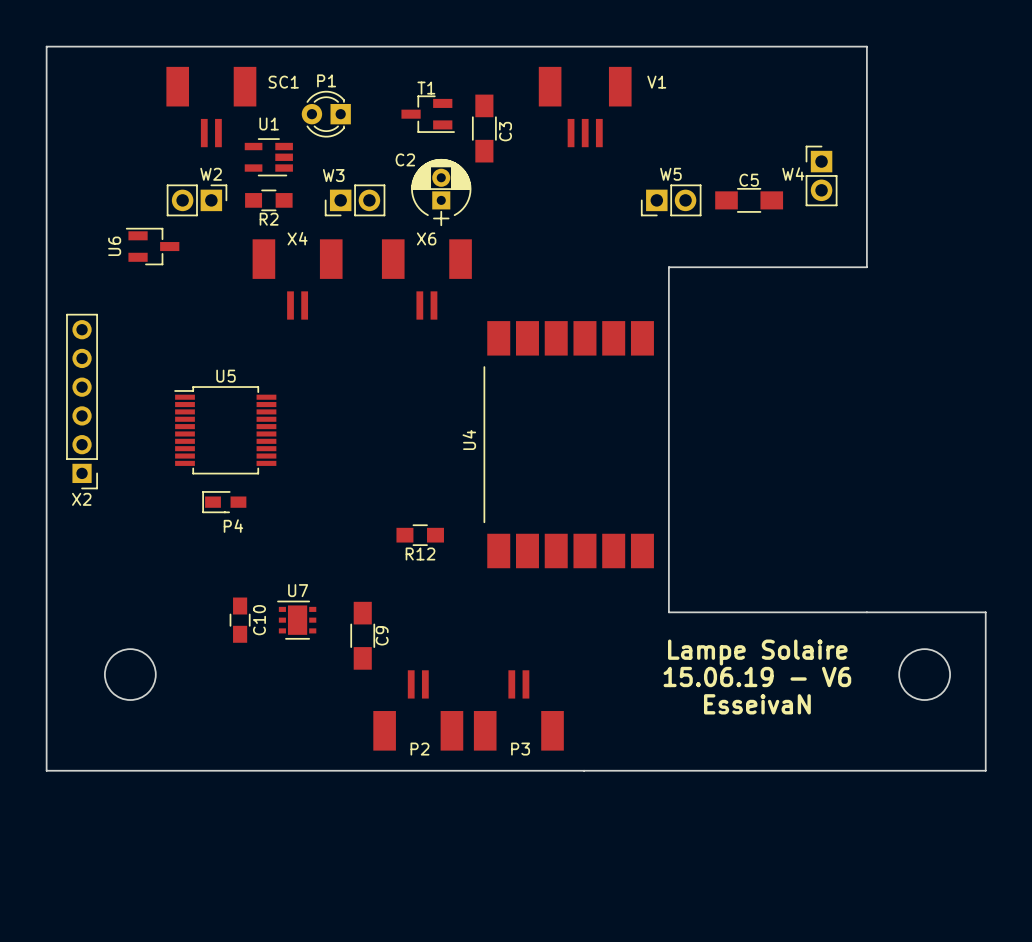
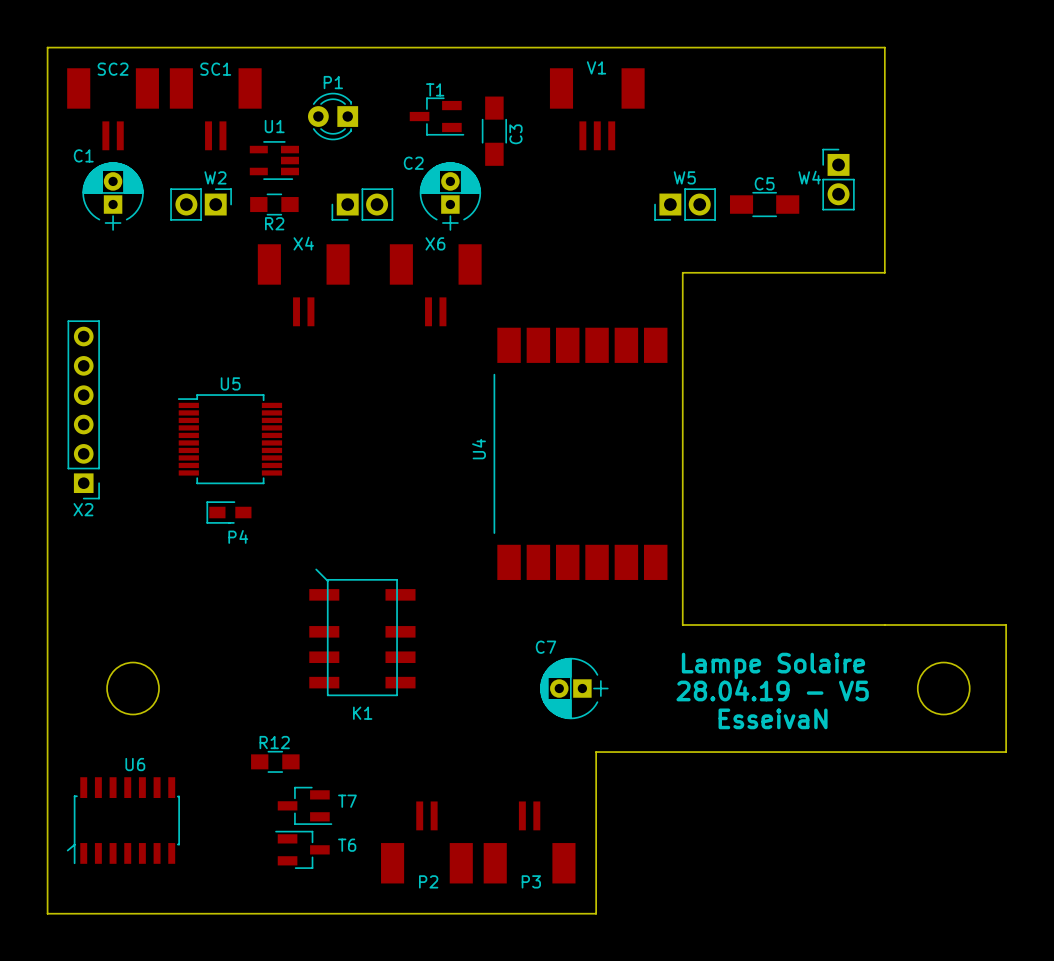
SC1 name position: SC1 (283, 82) -> SC1 (215, 69)
V1 name position: V1 (656, 82) -> V1 (596, 67)
SC2: none -> (113, 109)
W3 name: W3 (333, 175) -> none
C1: none -> (113, 196)
U6 footprint: [126, 227, 180, 266] -> [66, 777, 180, 865]
U6 name position: U6 (114, 246) -> U6 (135, 764)
R12 position: (420, 535) -> (275, 761)
R12 name position: R12 (420, 553) -> R12 (274, 742)
K1: none -> (362, 632)
C10: (240, 620) -> none
U7: (296, 620) -> none
C9: (362, 635) -> none
C7: none -> (574, 688)
text: 15.06.19 - V6 (757, 676) -> 28.04.19 - V5 (772, 690)
P2 position: (418, 710) -> (426, 842)
P3 position: (518, 710) -> (529, 842)
board edge: (985, 736) (985, 770) (46, 770) -> (1006, 752) (596, 752) (596, 913) (47, 913) (47, 786)
T7: none -> (304, 805)
T6: none -> (302, 849)

